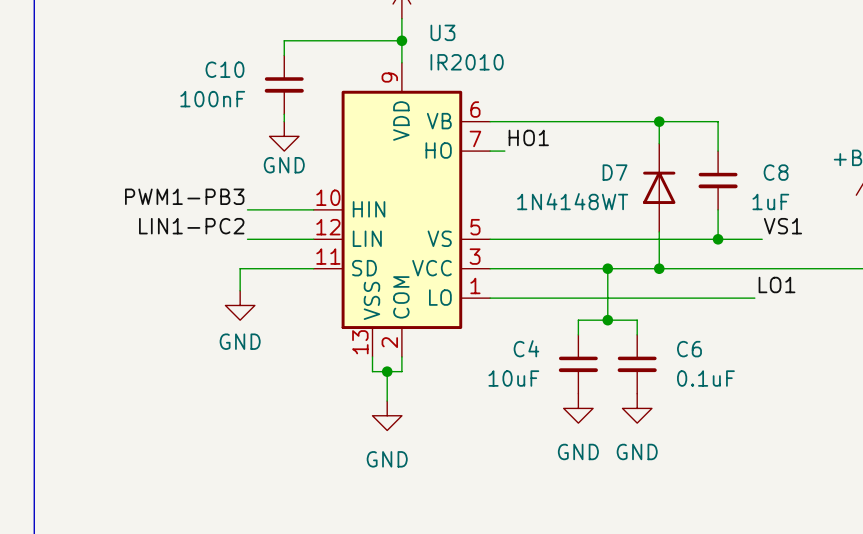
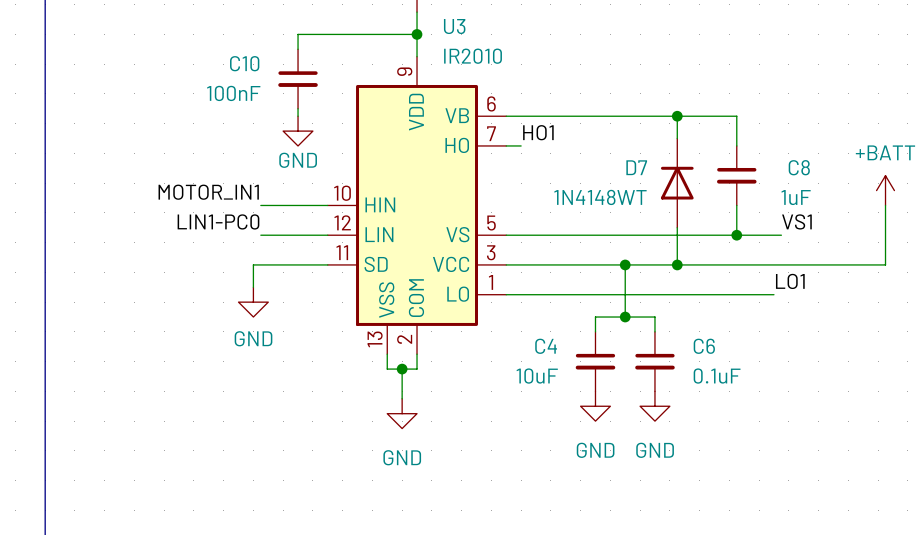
label: PWM1-PB3 (184, 196) -> MOTOR_IN1 (208, 192)
label: LIN1-PC2 (191, 226) -> LIN1-PC0 (218, 221)

